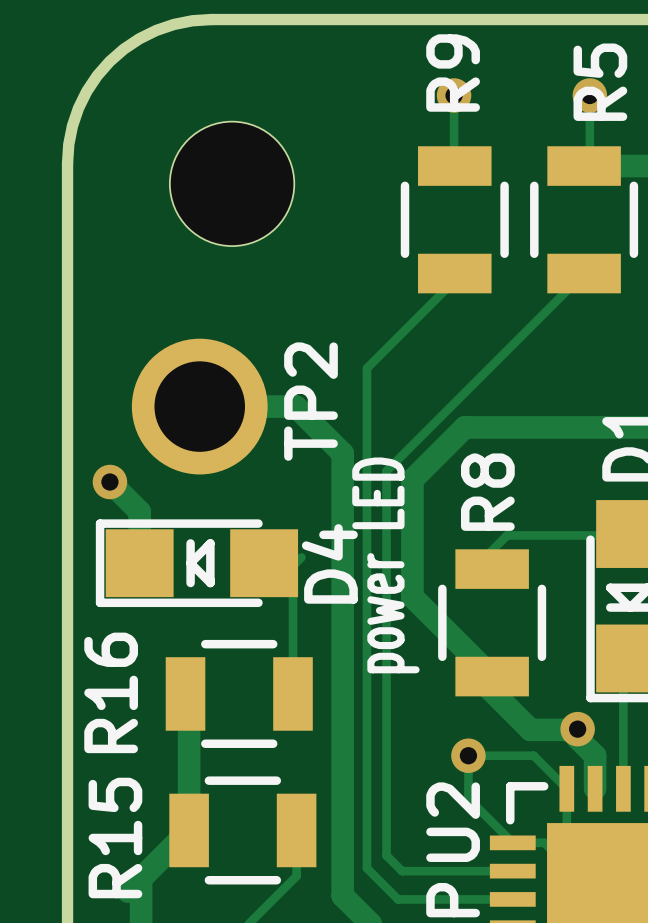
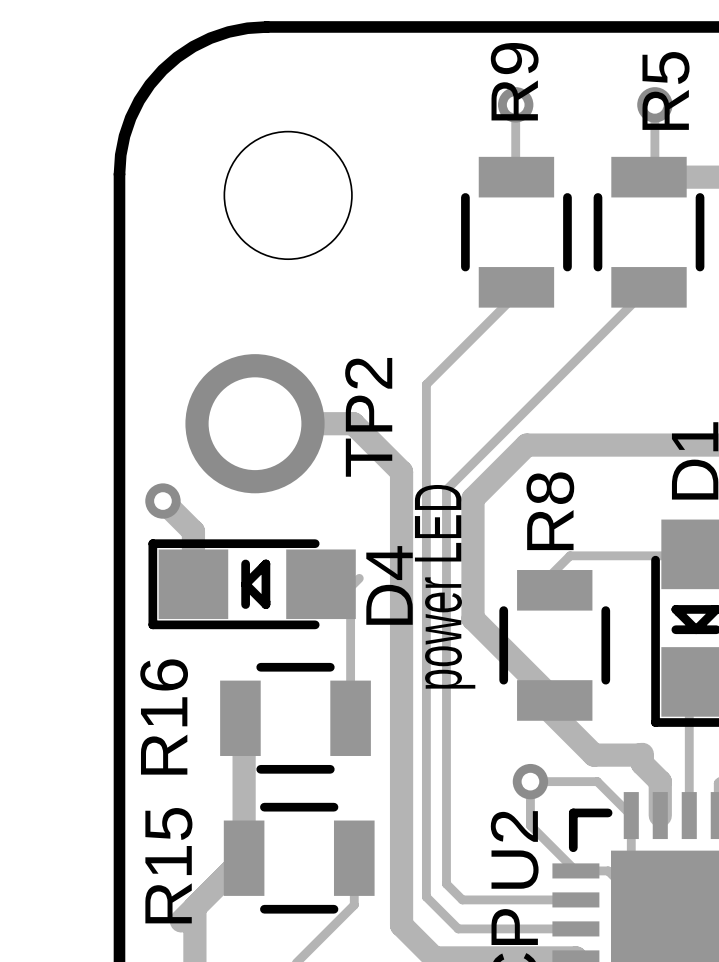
via: (577, 729) -> none

